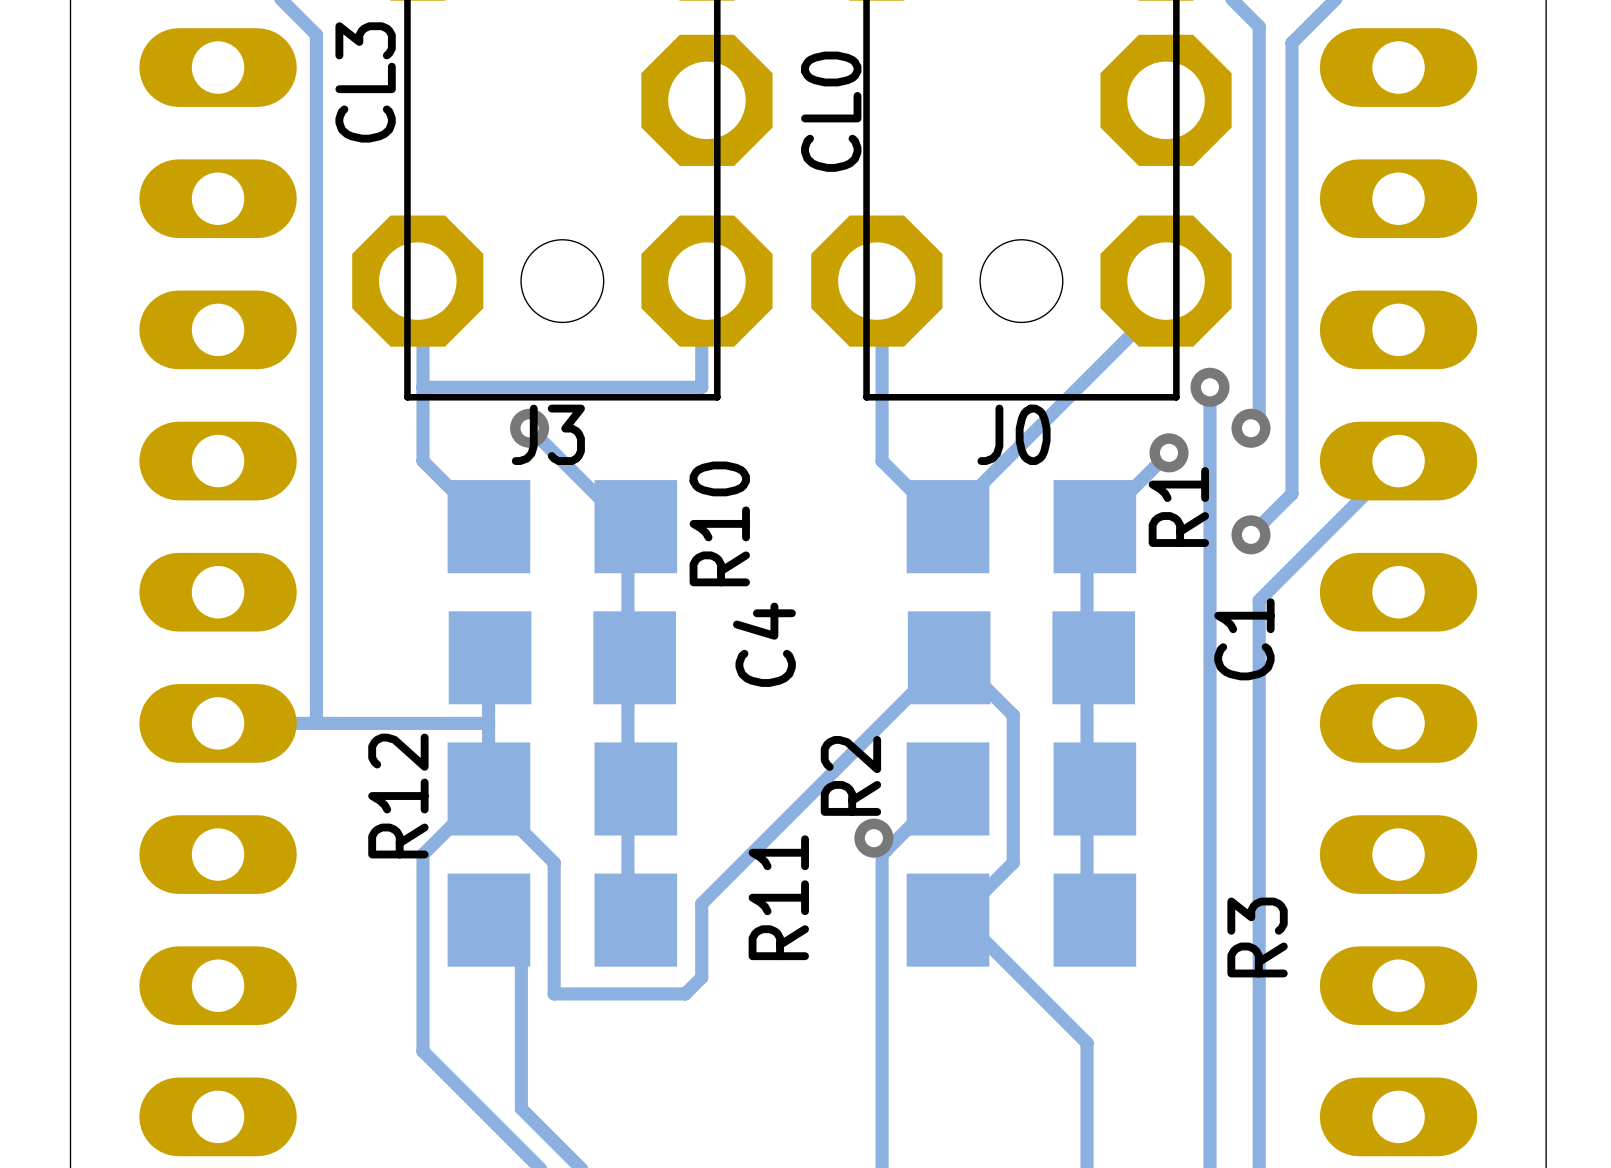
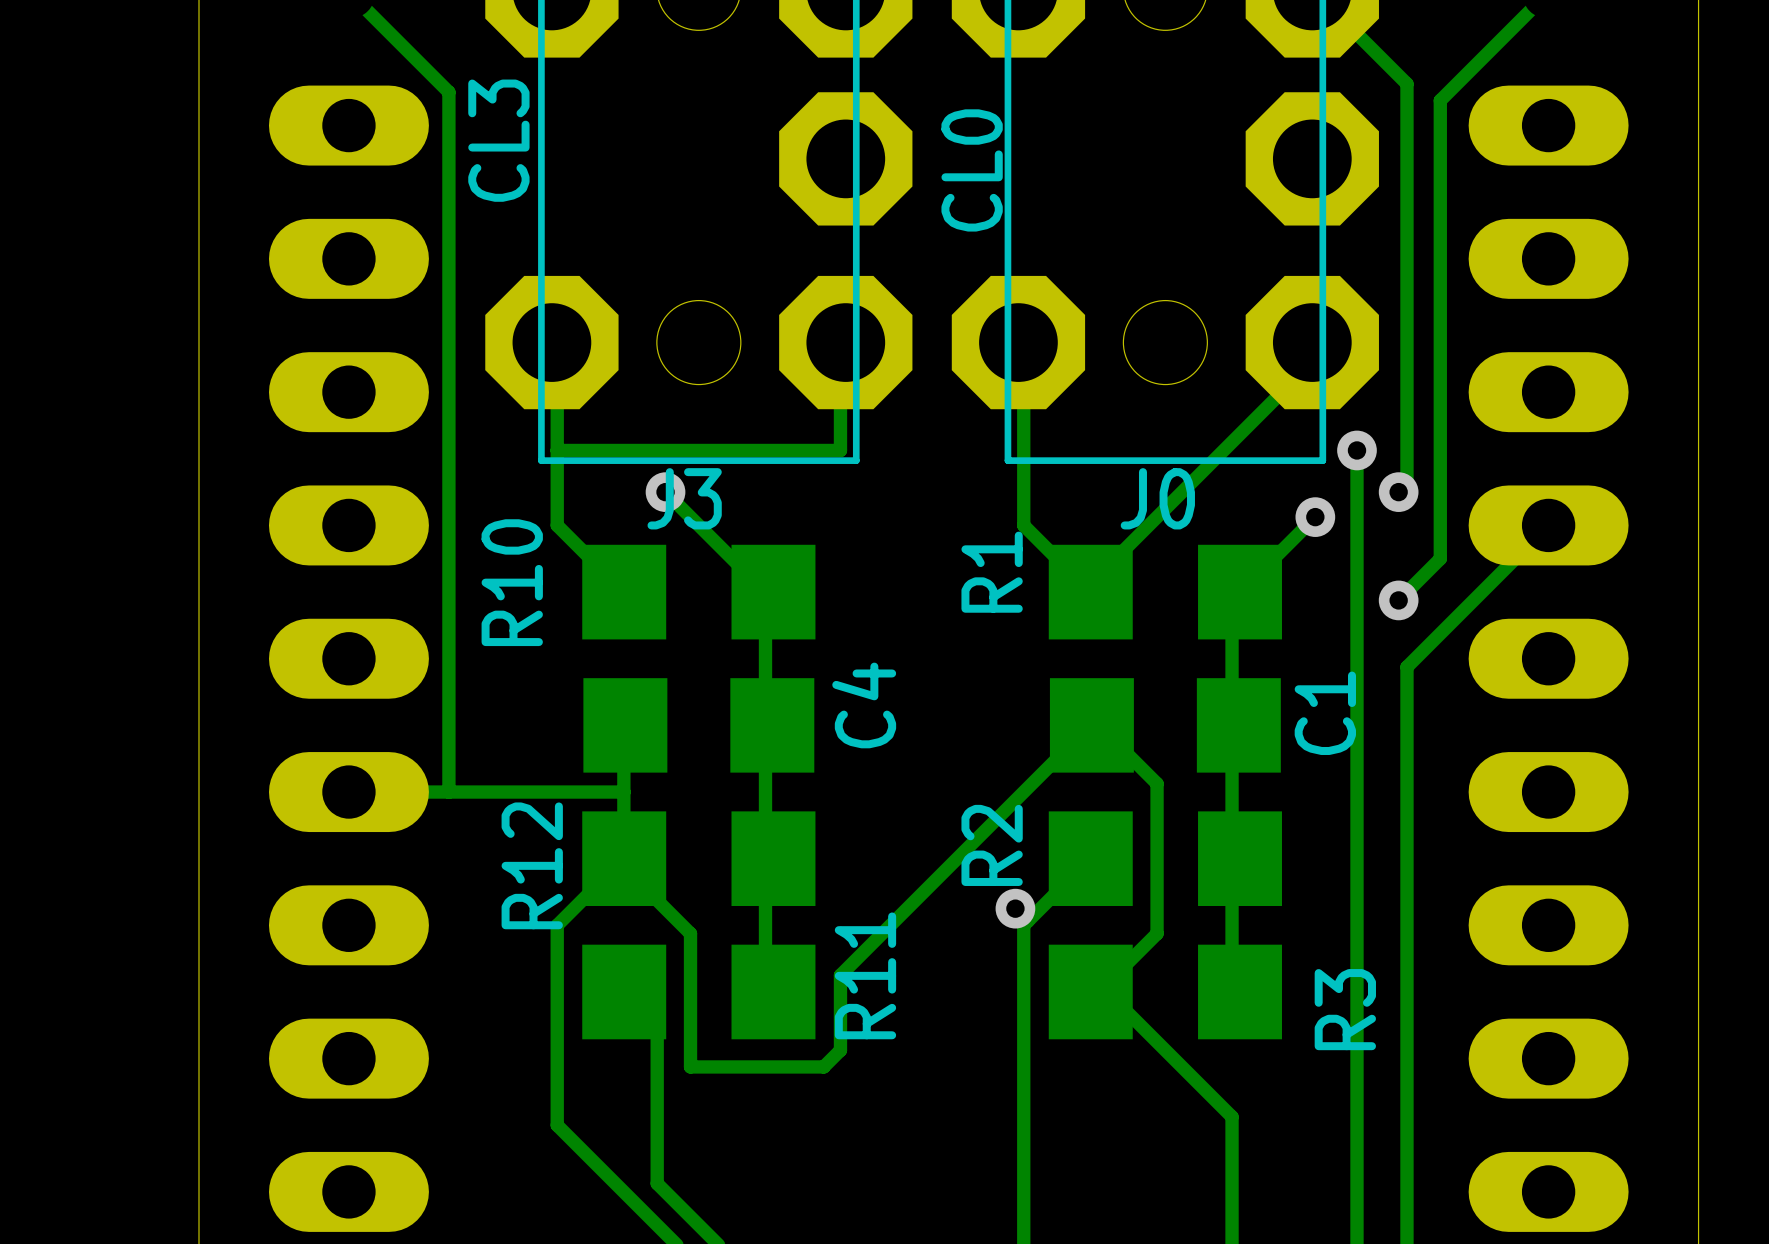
R1 name position: R1 (1178, 507) -> R1 (992, 572)
R10 name position: R10 (719, 523) -> R10 (512, 582)
C1 name position: C1 (1244, 639) -> C1 (1325, 713)
C4 name position: C4 (764, 644) -> C4 (864, 705)
R11 name position: R11 (778, 897) -> R11 (865, 975)
R3 name position: R3 (1257, 937) -> R3 (1345, 1009)

